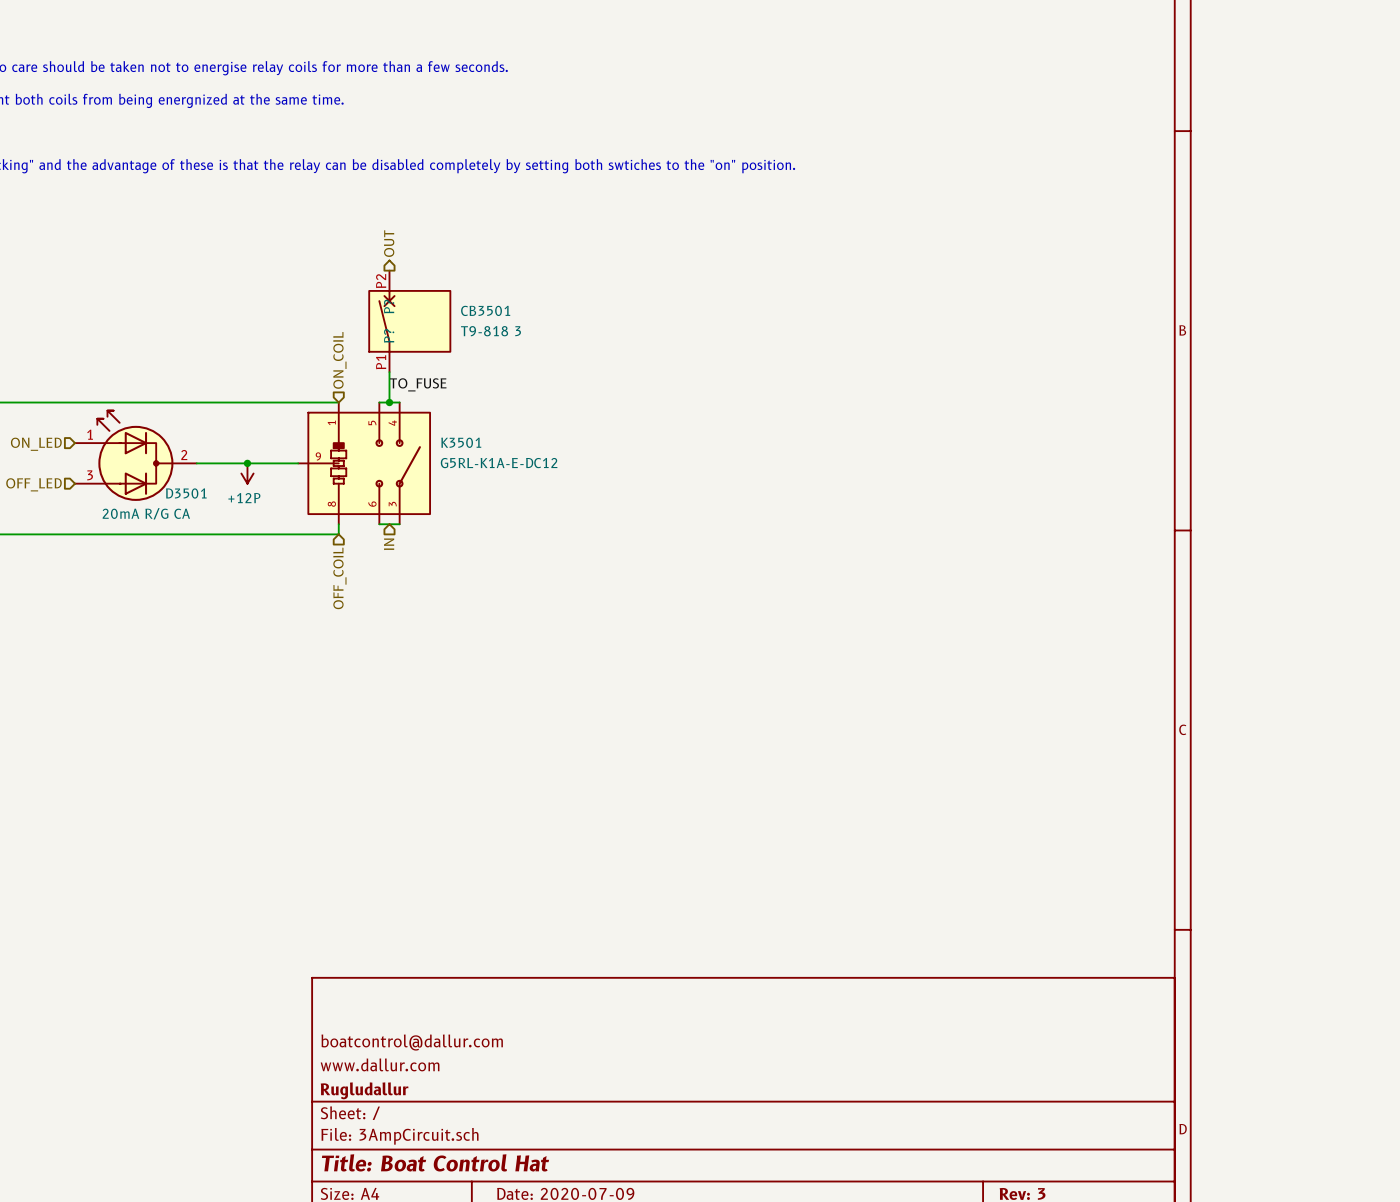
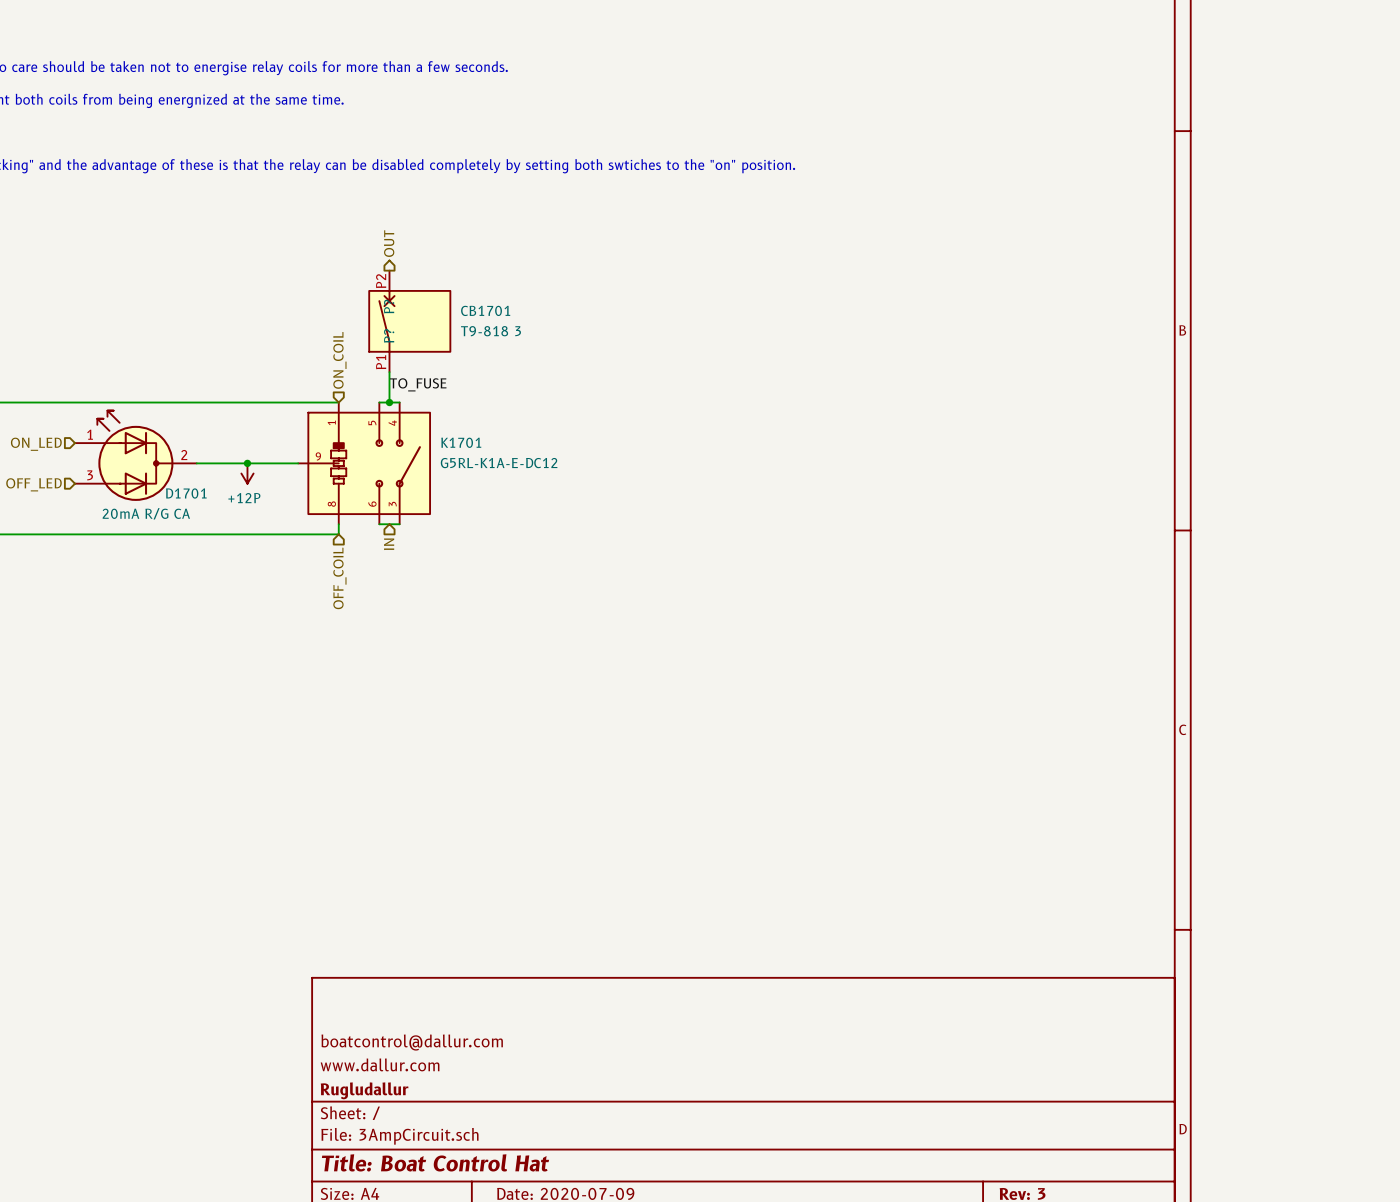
CB3501 name: CB3501 (485, 310) -> CB1701 (485, 310)
K3501 name: K3501 (461, 442) -> K1701 (461, 442)
D3501 name: D3501 (186, 493) -> D1701 (186, 493)

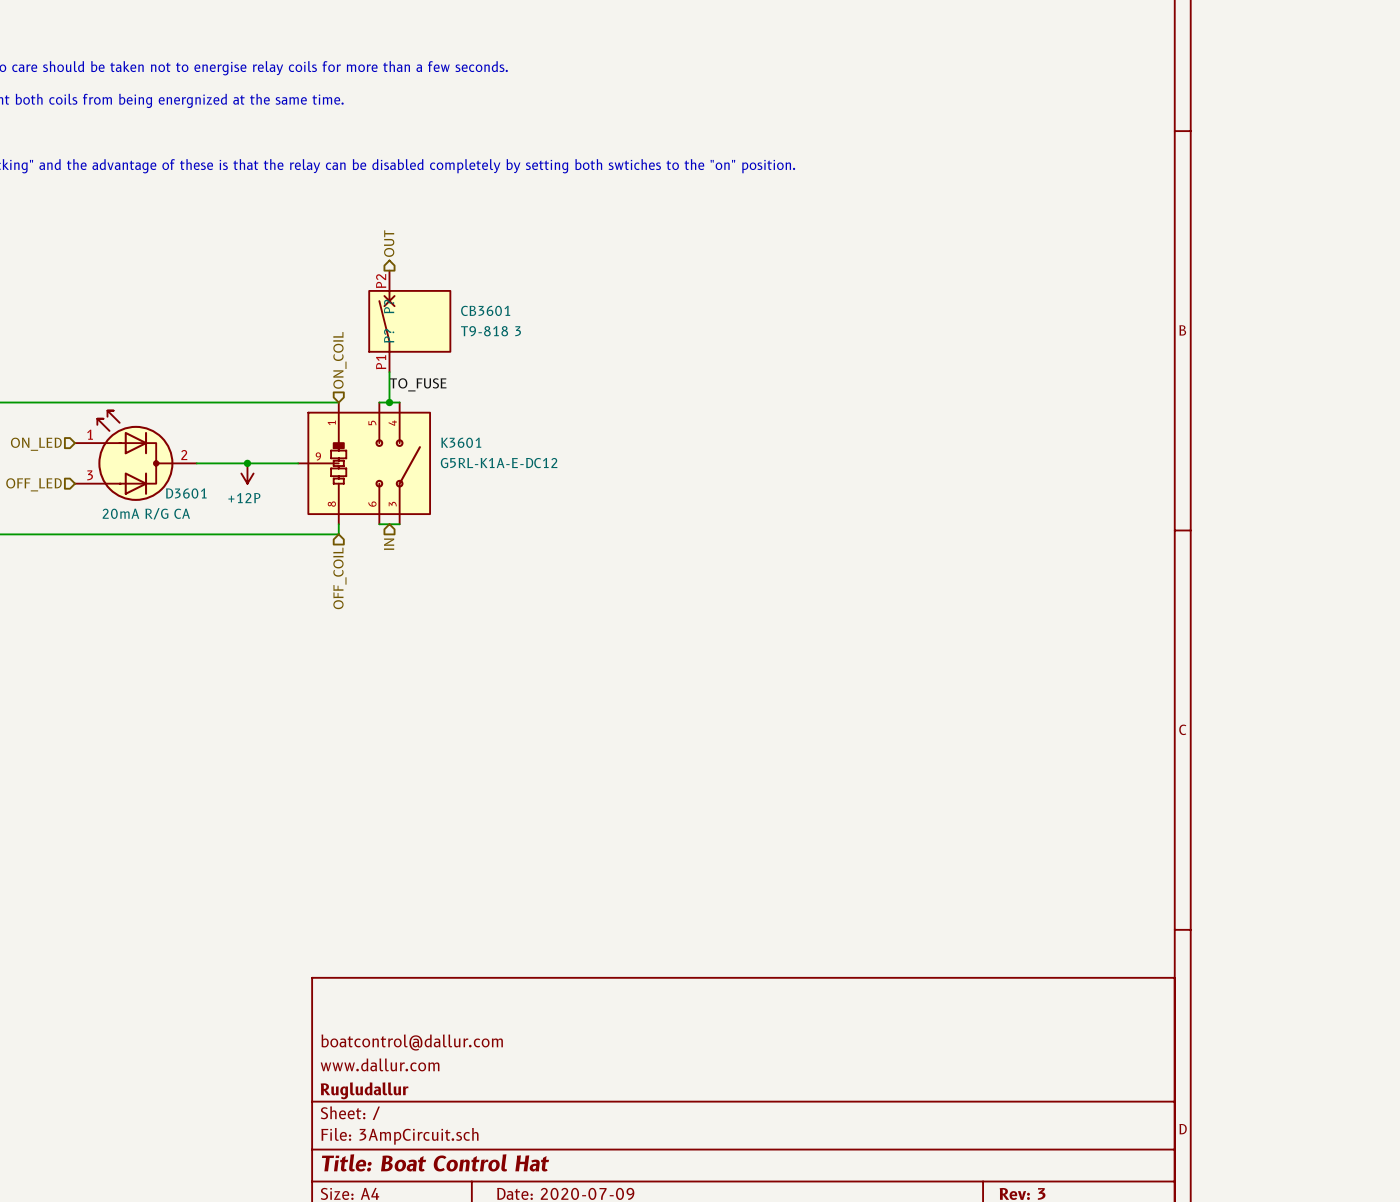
CB1701 name: CB1701 (485, 310) -> CB3601 (485, 310)
K1701 name: K1701 (461, 442) -> K3601 (461, 442)
D1701 name: D1701 (186, 493) -> D3601 (186, 493)

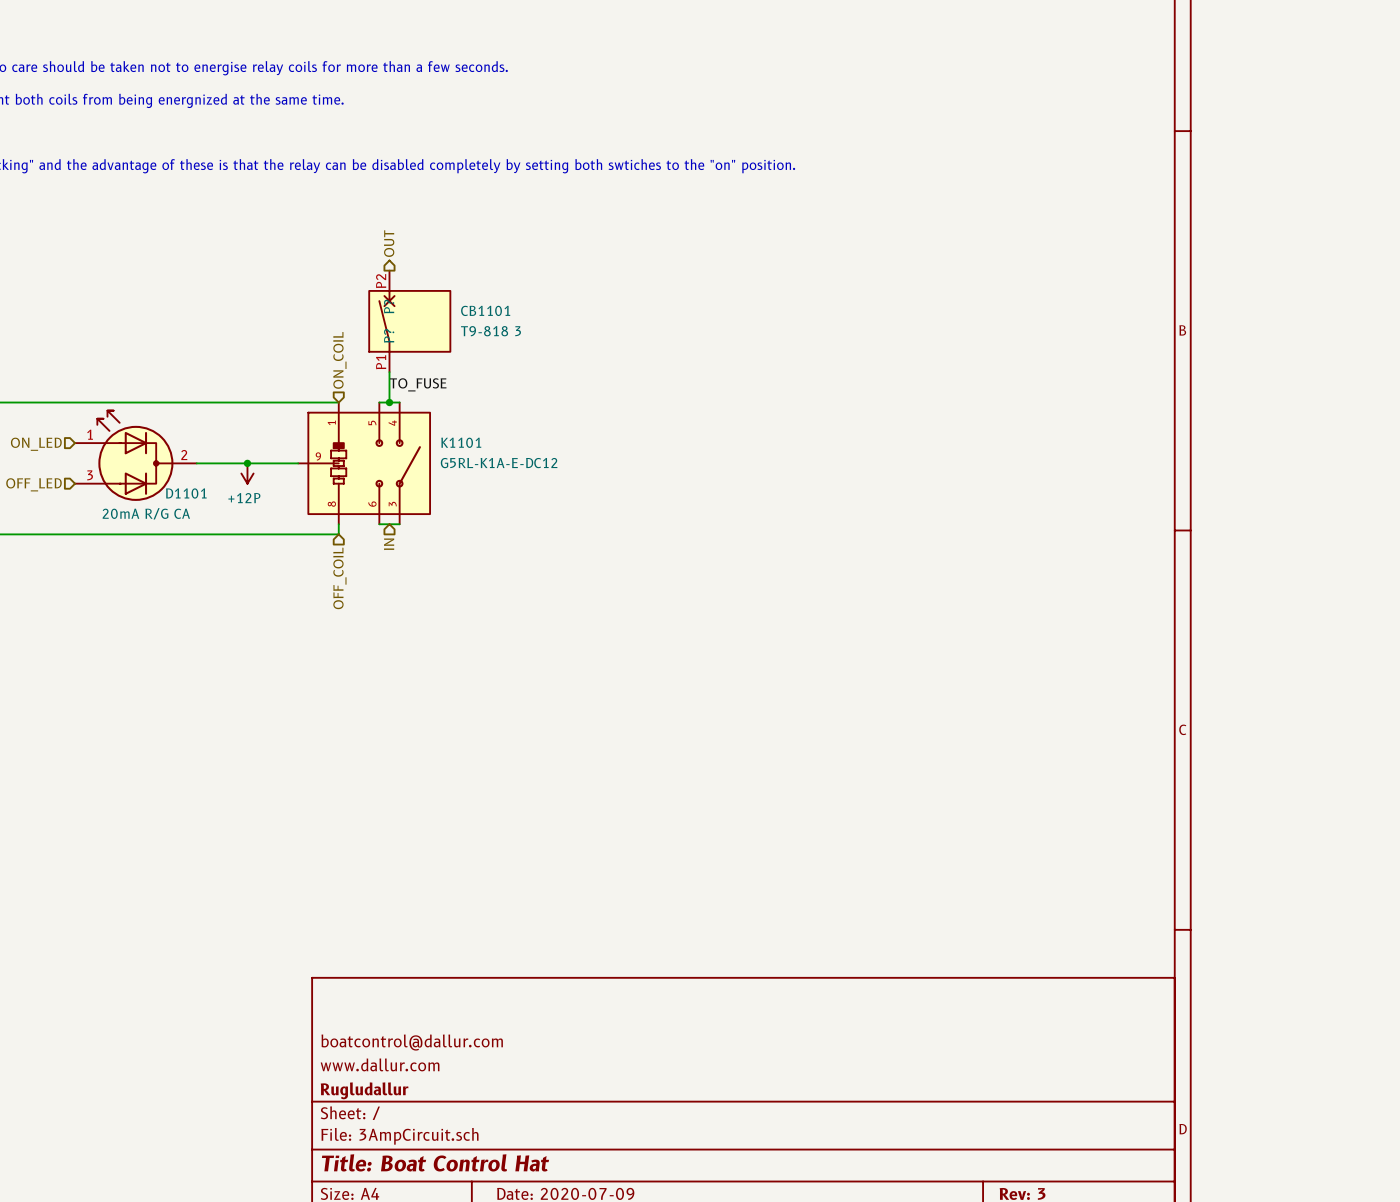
CB3601 name: CB3601 (485, 310) -> CB1101 (485, 310)
K3601 name: K3601 (461, 442) -> K1101 (461, 442)
D3601 name: D3601 (186, 493) -> D1101 (186, 493)

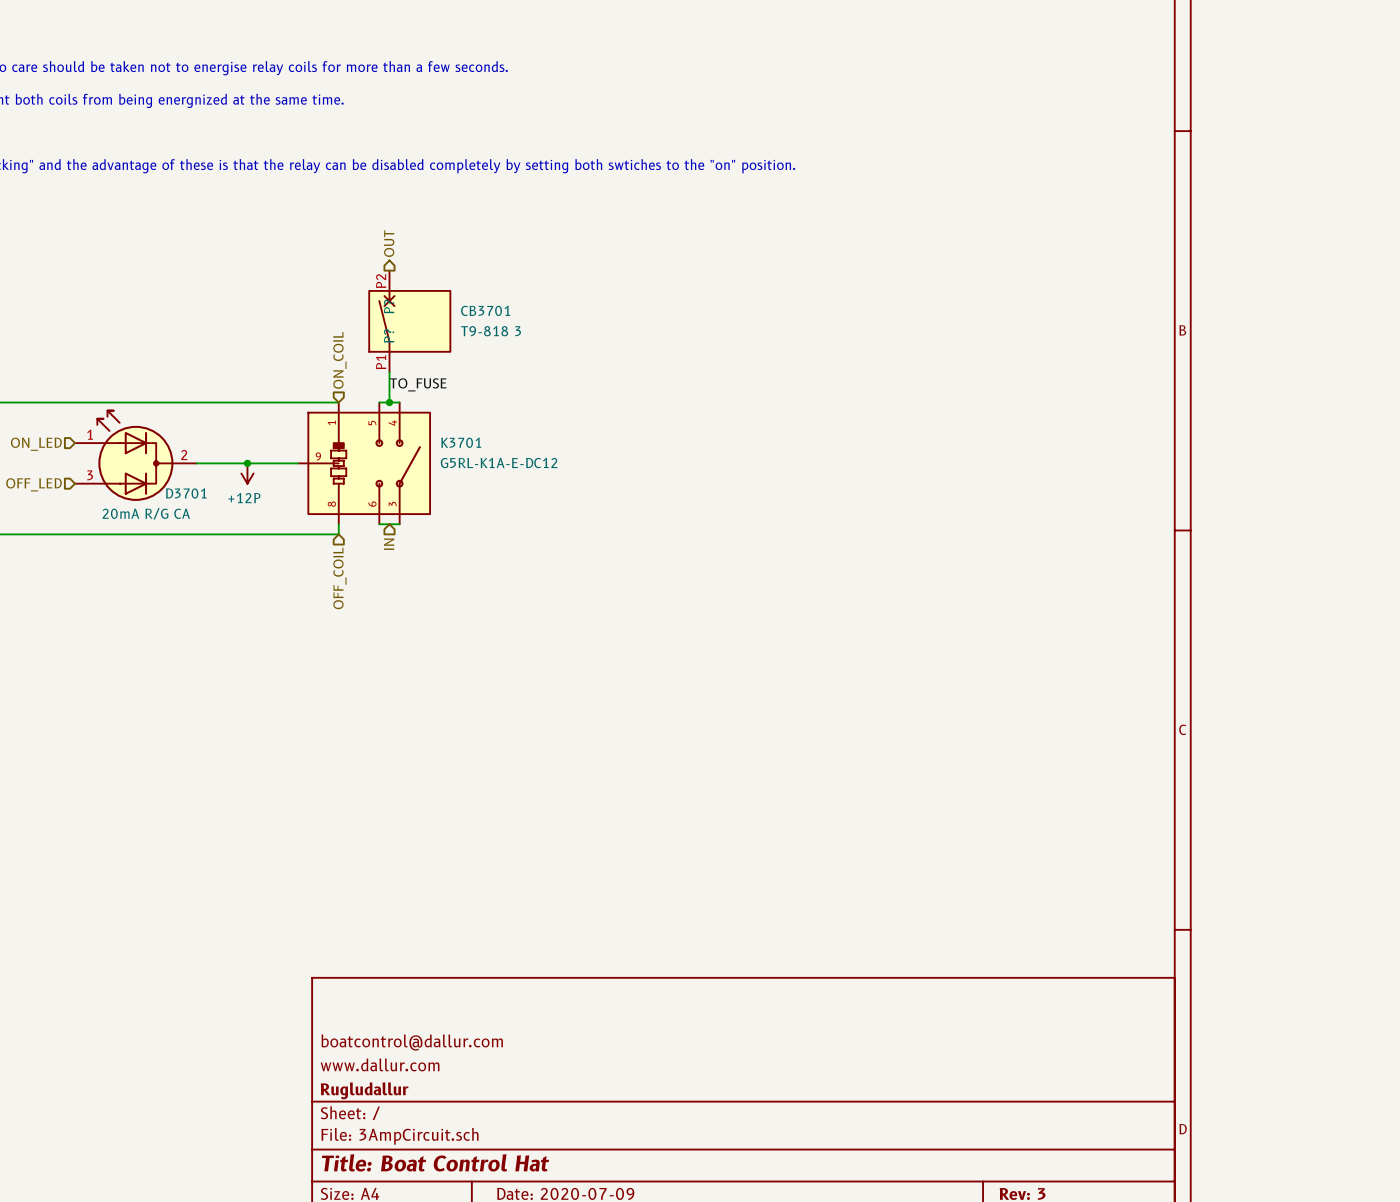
CB1101 name: CB1101 (485, 310) -> CB3701 (485, 310)
K1101 name: K1101 (461, 442) -> K3701 (461, 442)
D1101 name: D1101 (186, 493) -> D3701 (186, 493)

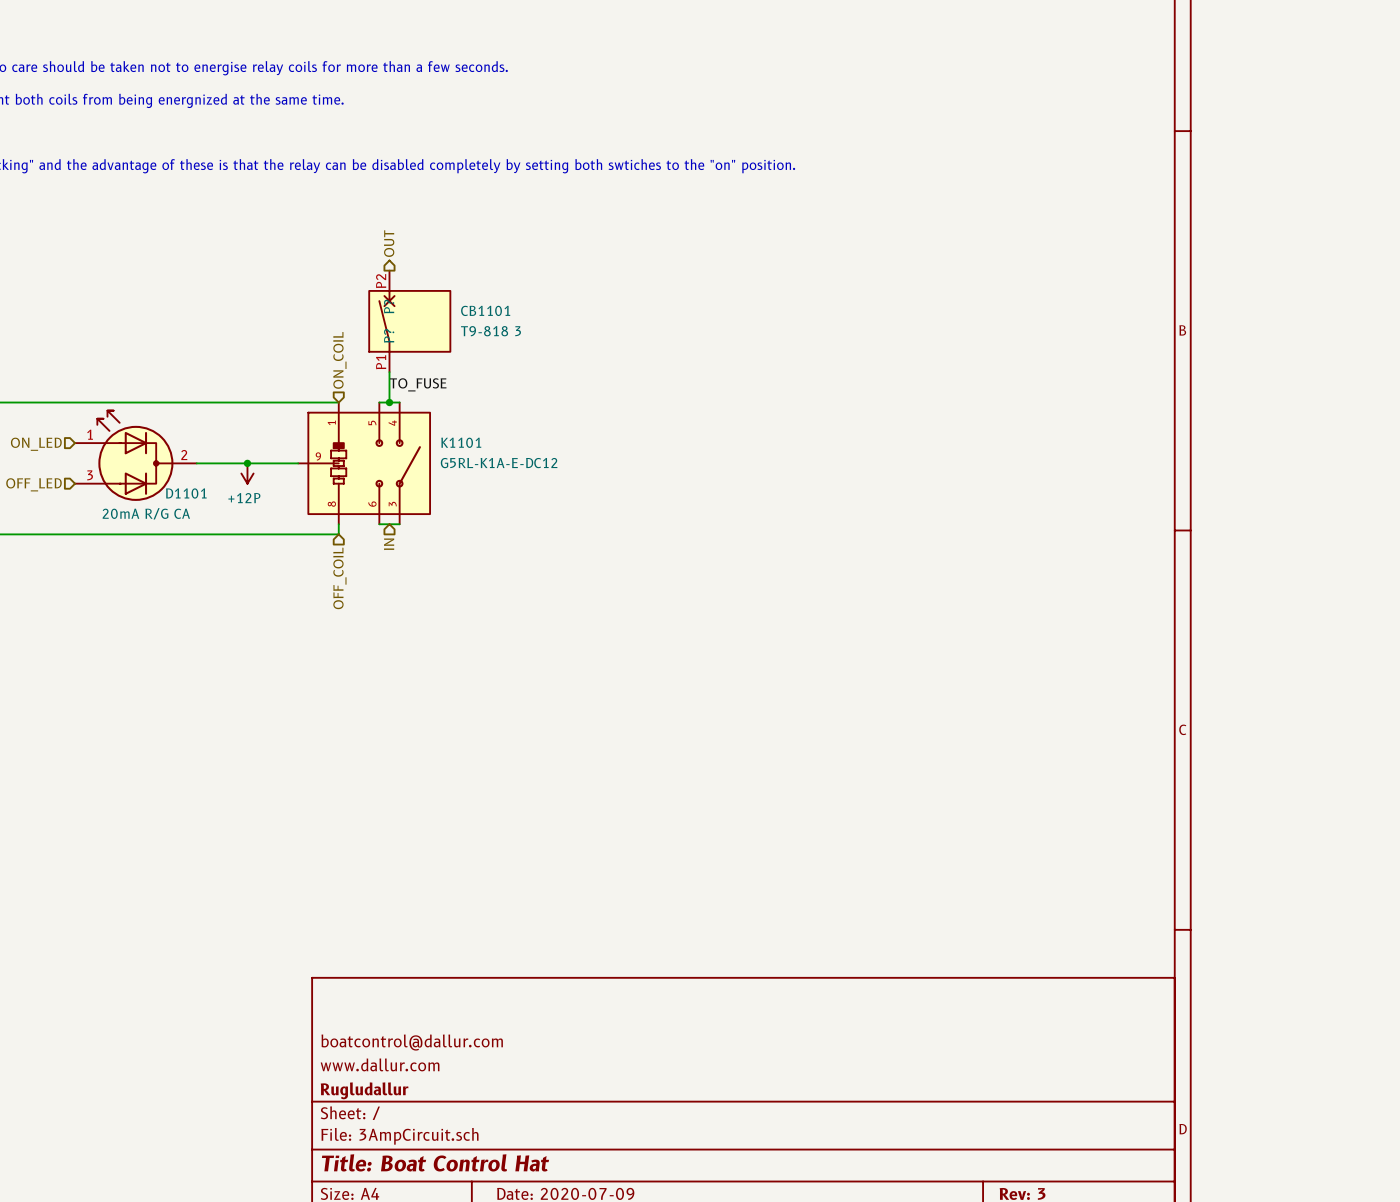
CB3701 name: CB3701 (485, 310) -> CB1101 (485, 310)
K3701 name: K3701 (461, 442) -> K1101 (461, 442)
D3701 name: D3701 (186, 493) -> D1101 (186, 493)

